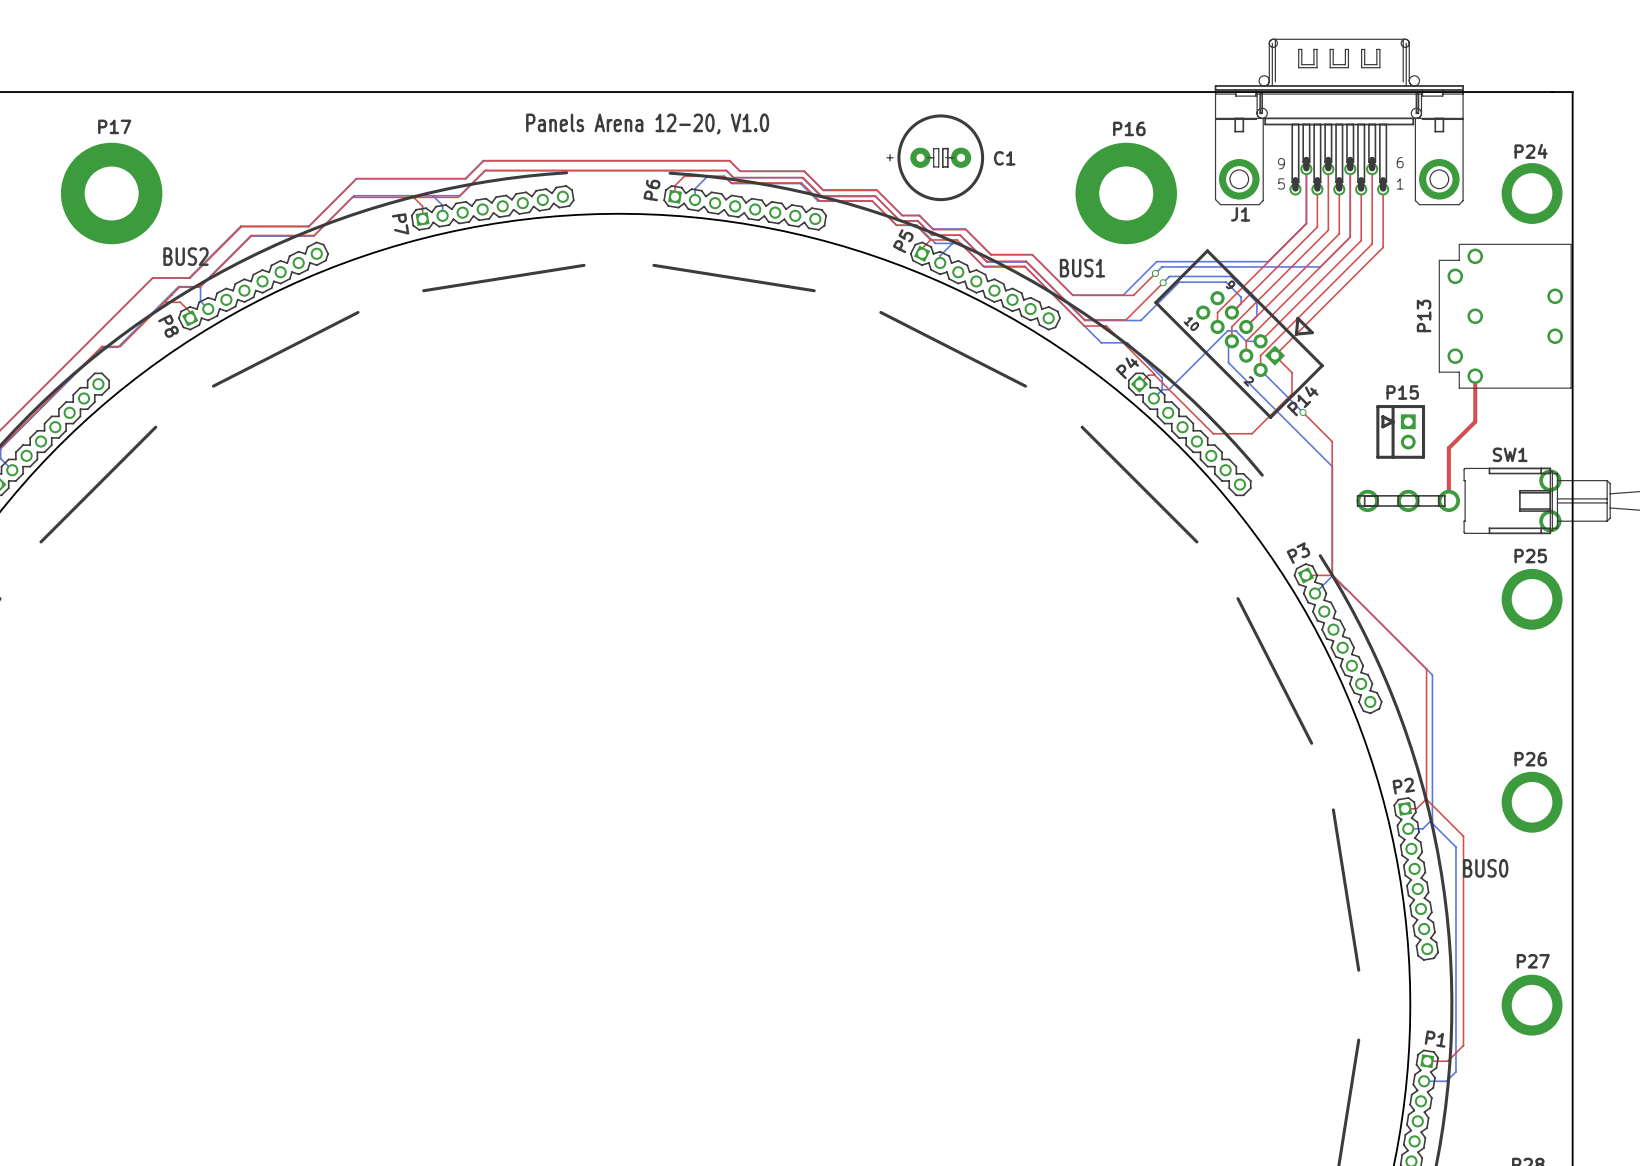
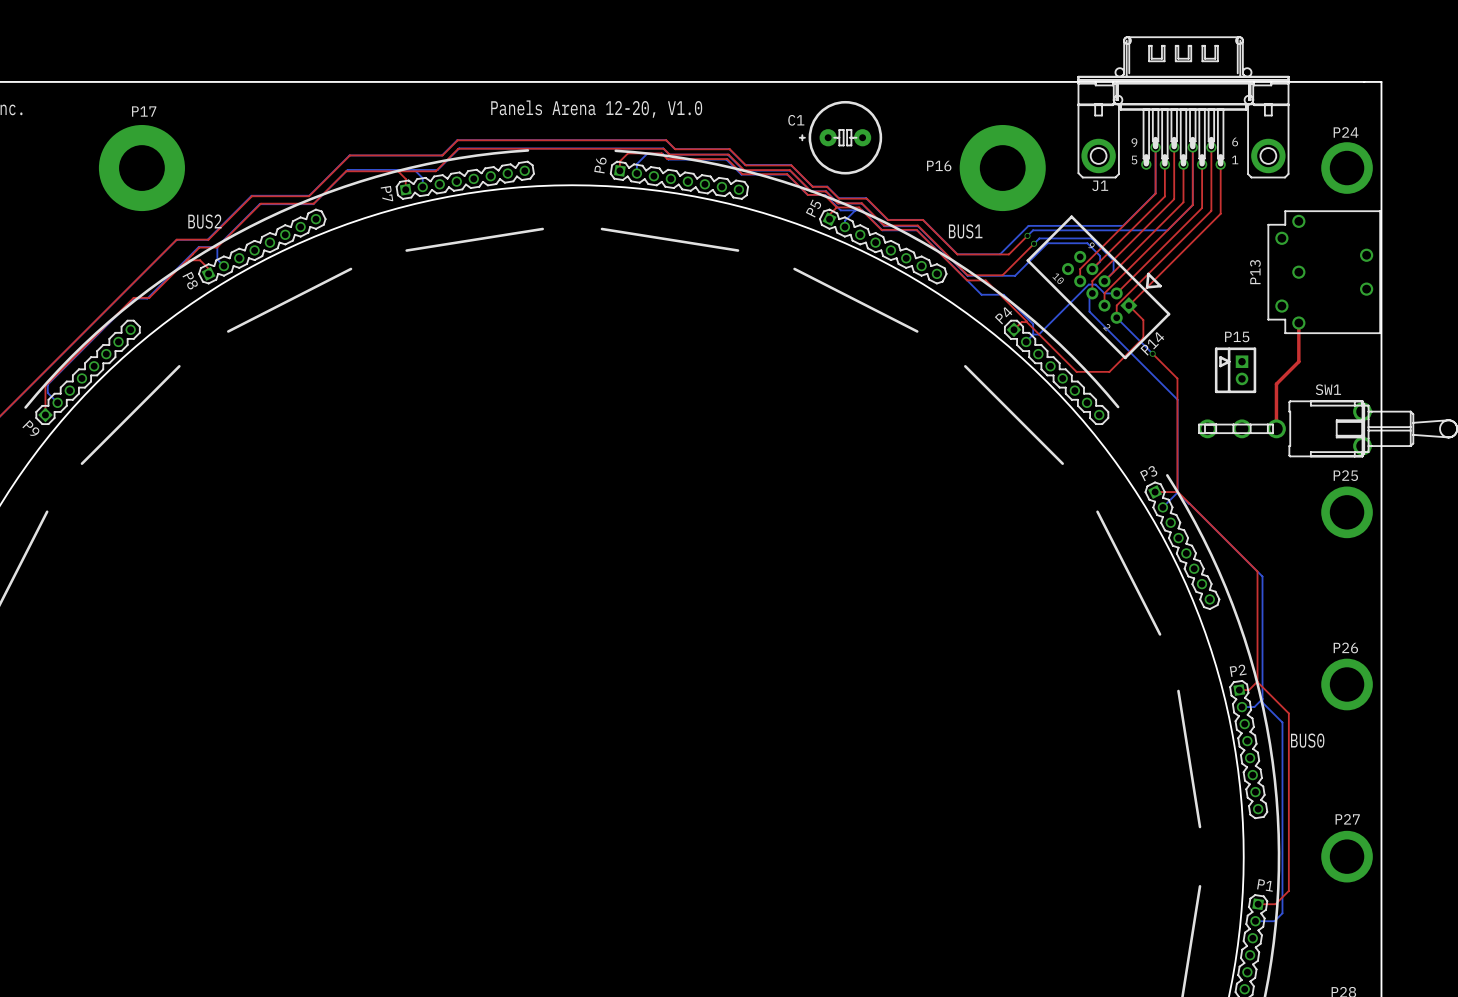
P16 name position: P16 (1129, 128) -> P16 (939, 166)
C1 name position: C1 (1004, 158) -> C1 (796, 120)

